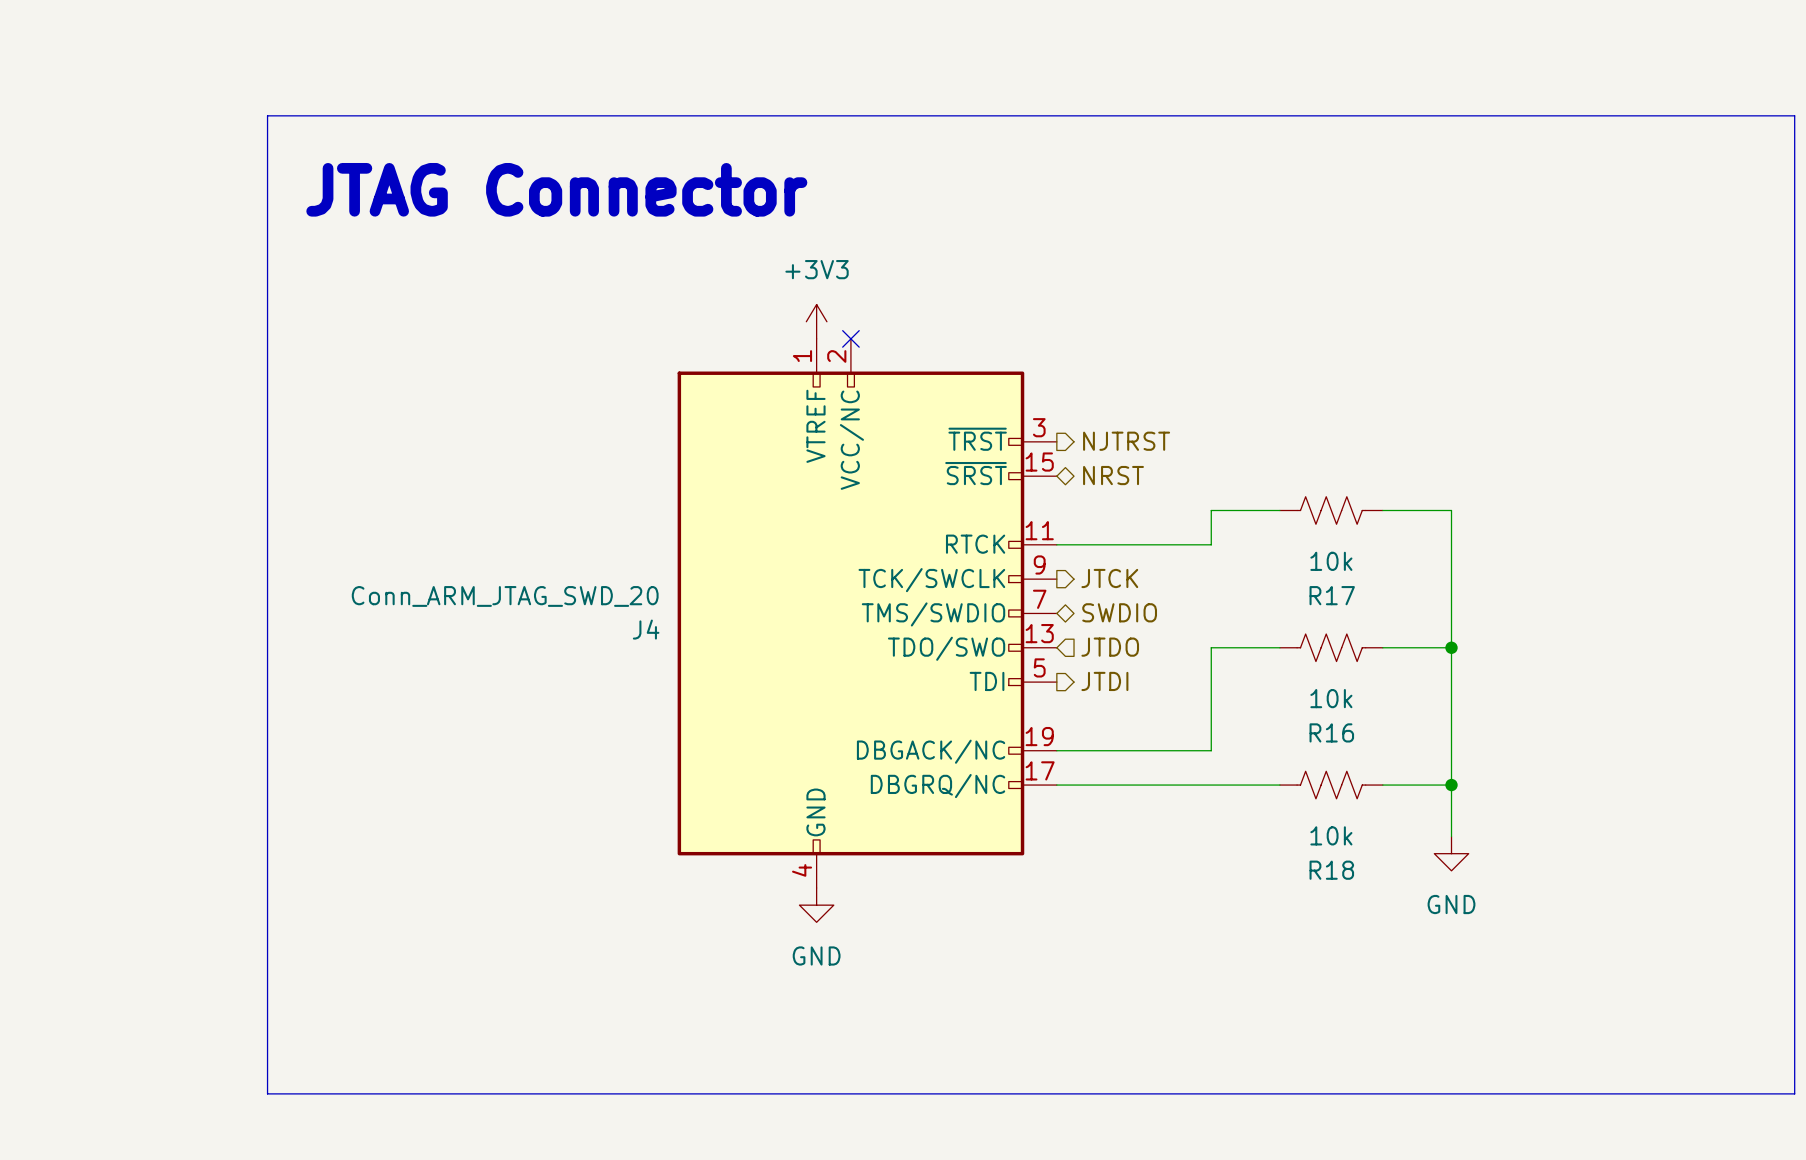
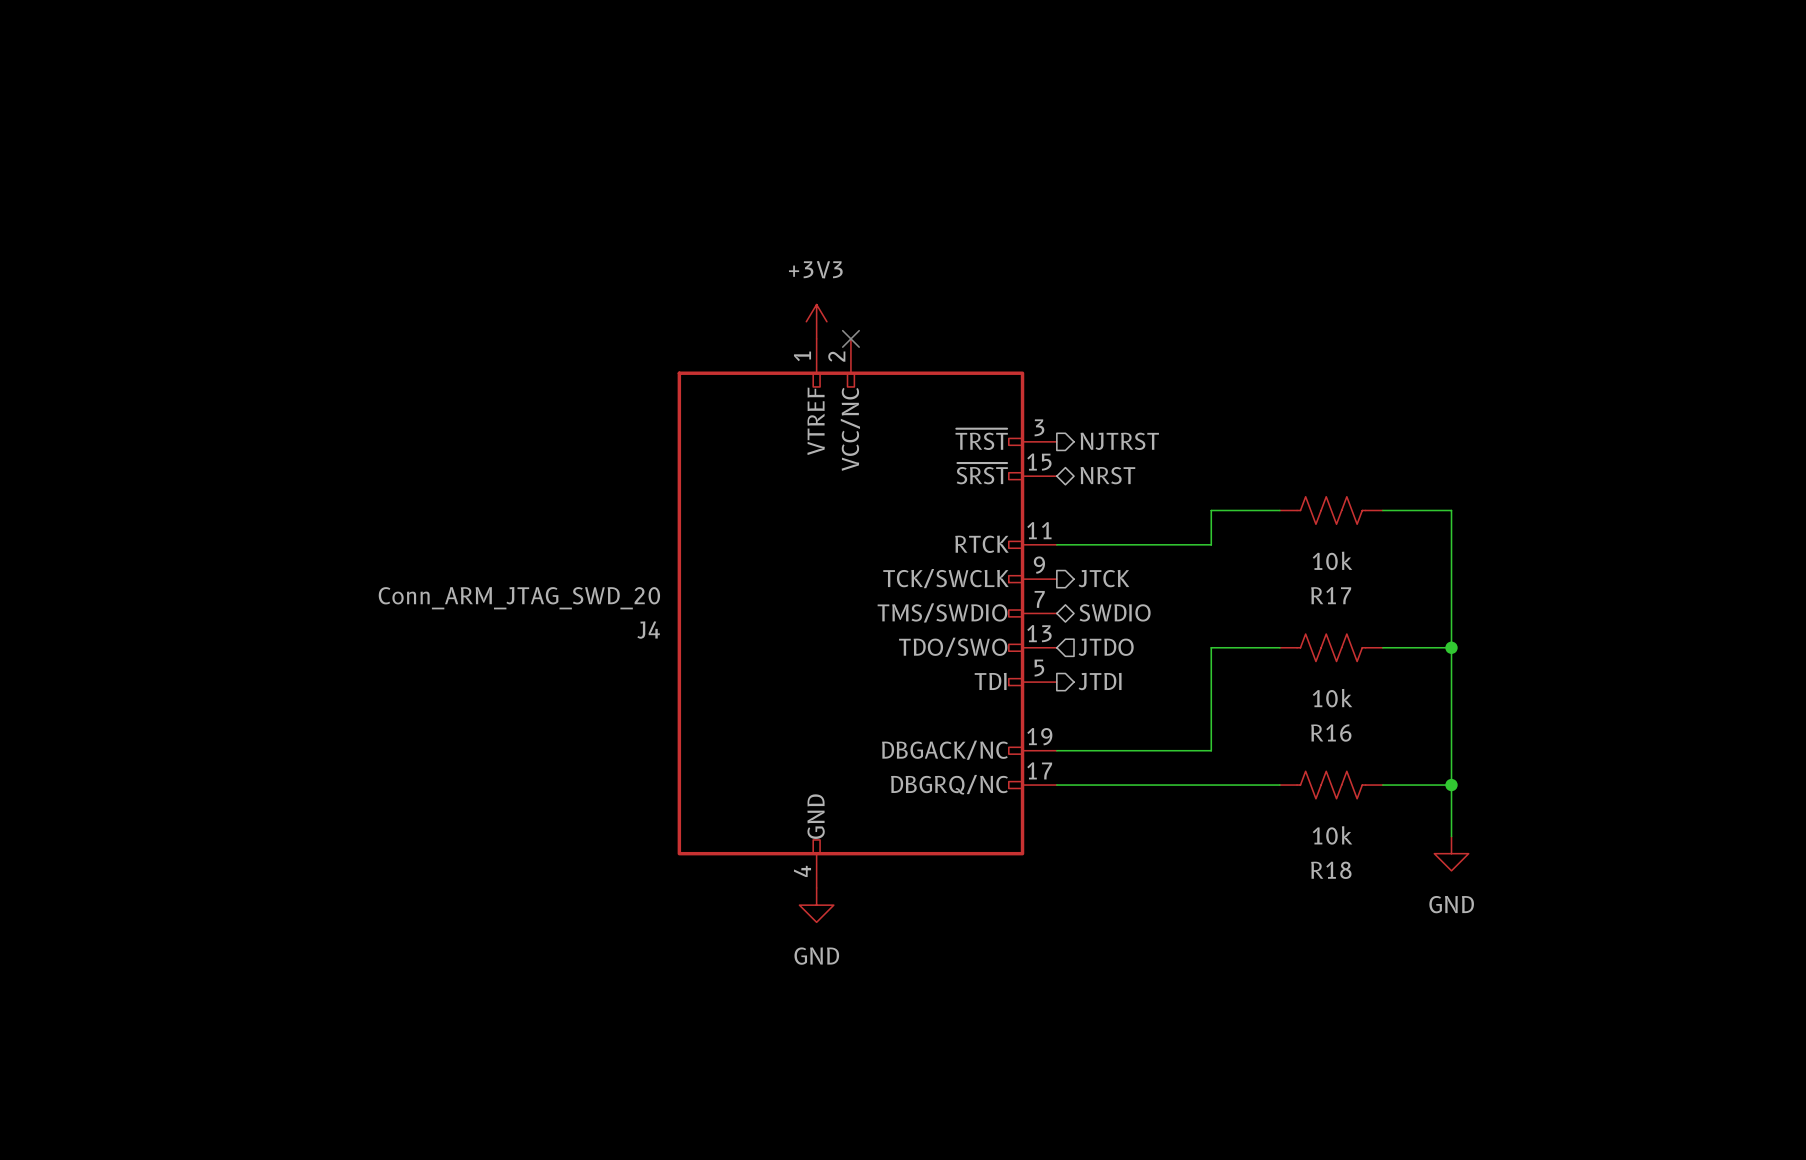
line: (267, 115) (1794, 115) (1794, 1093) (267, 1093) (267, 115) -> none
text: JTAG Connector (556, 189) -> none

